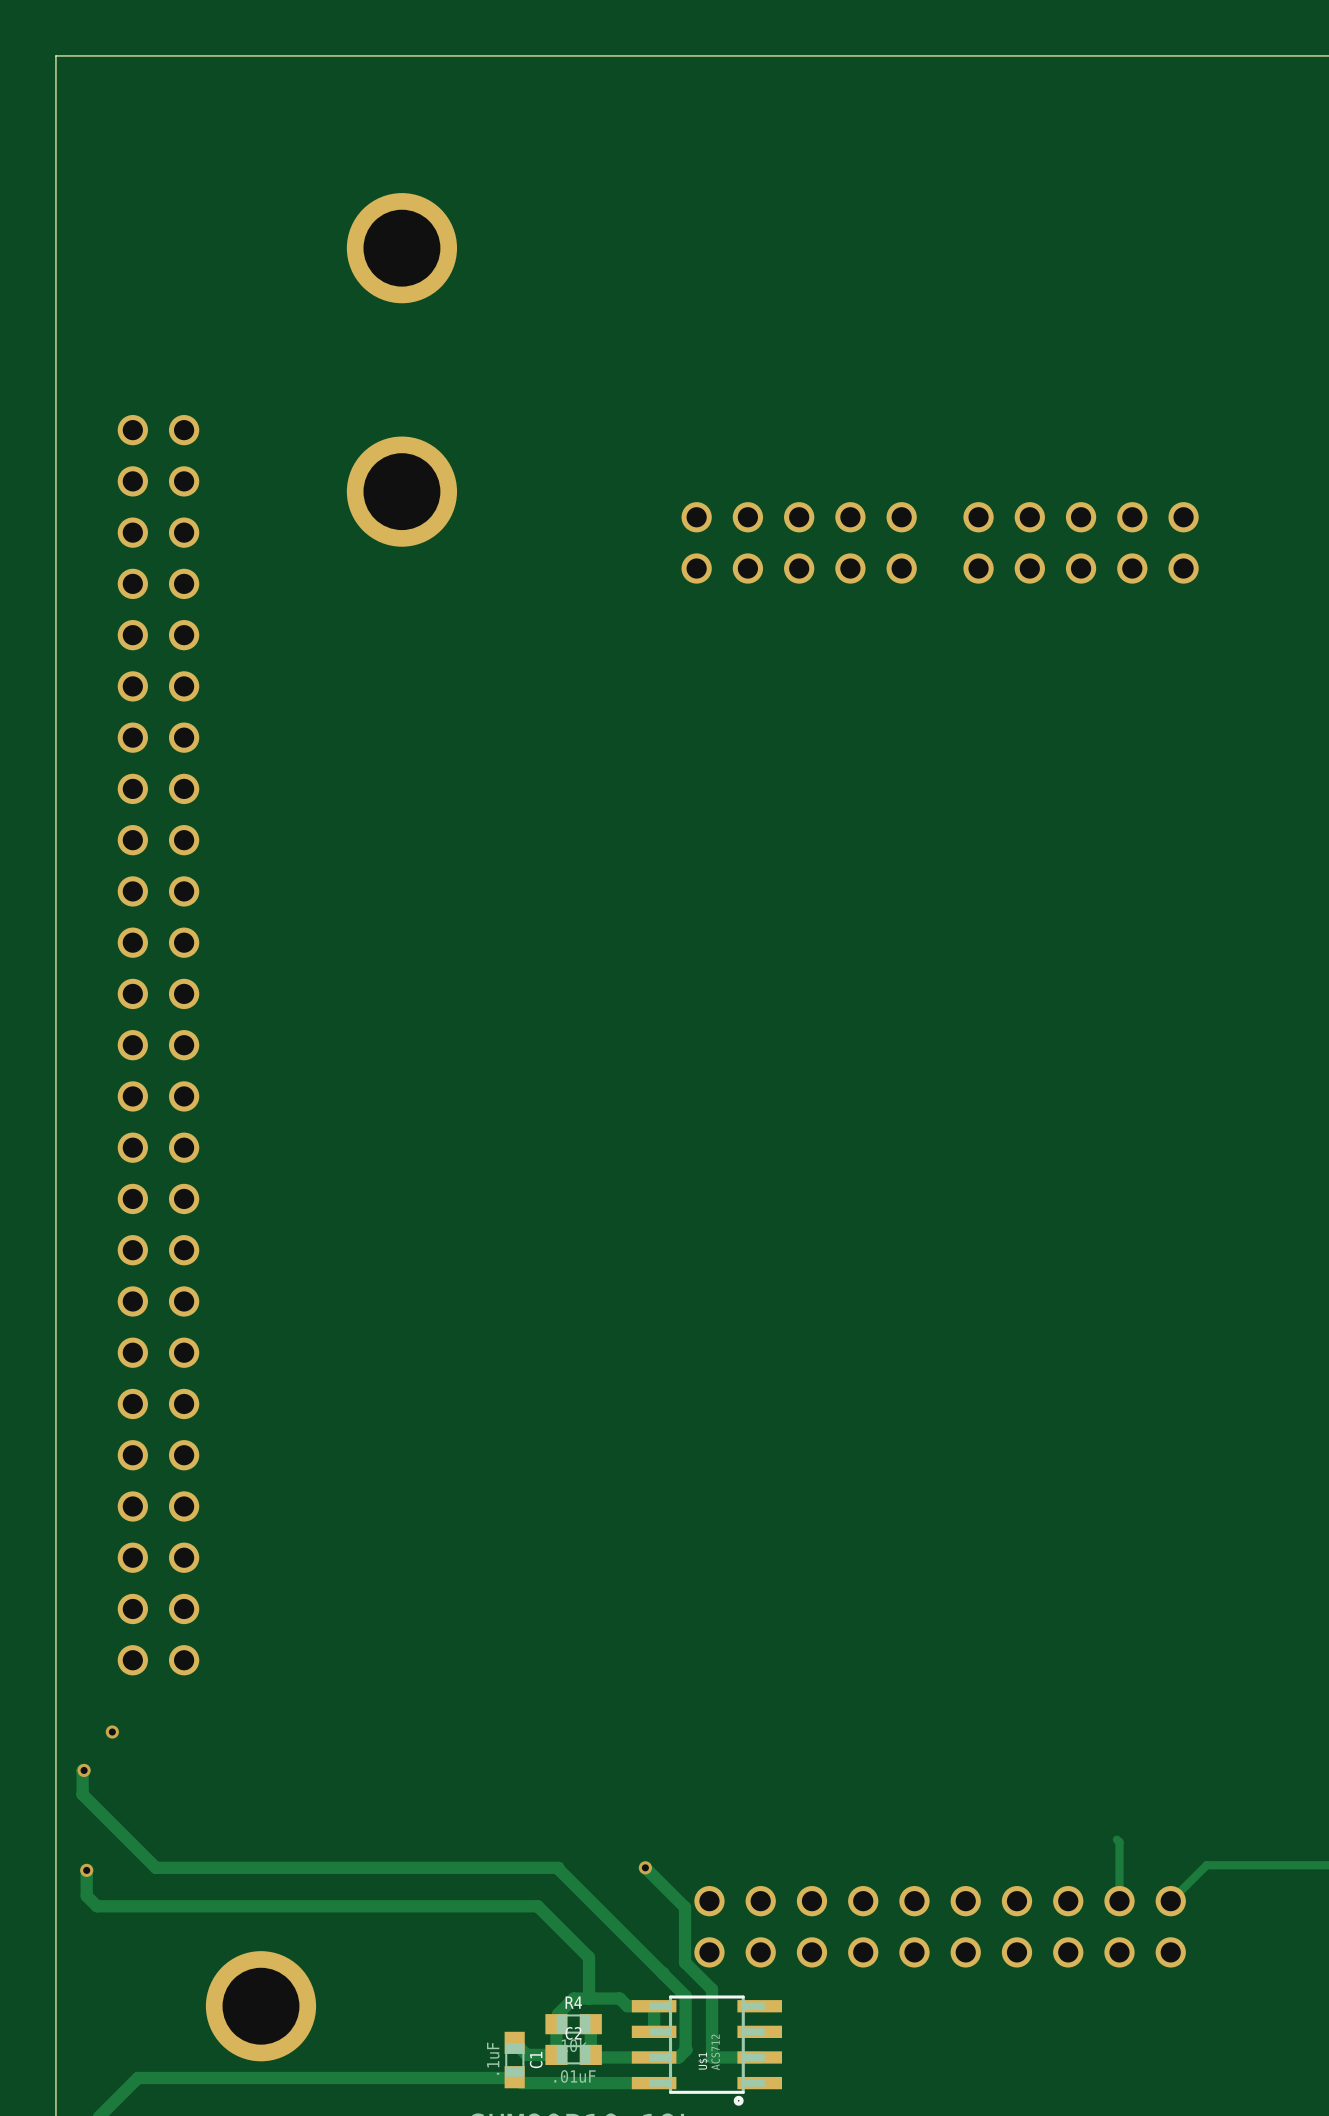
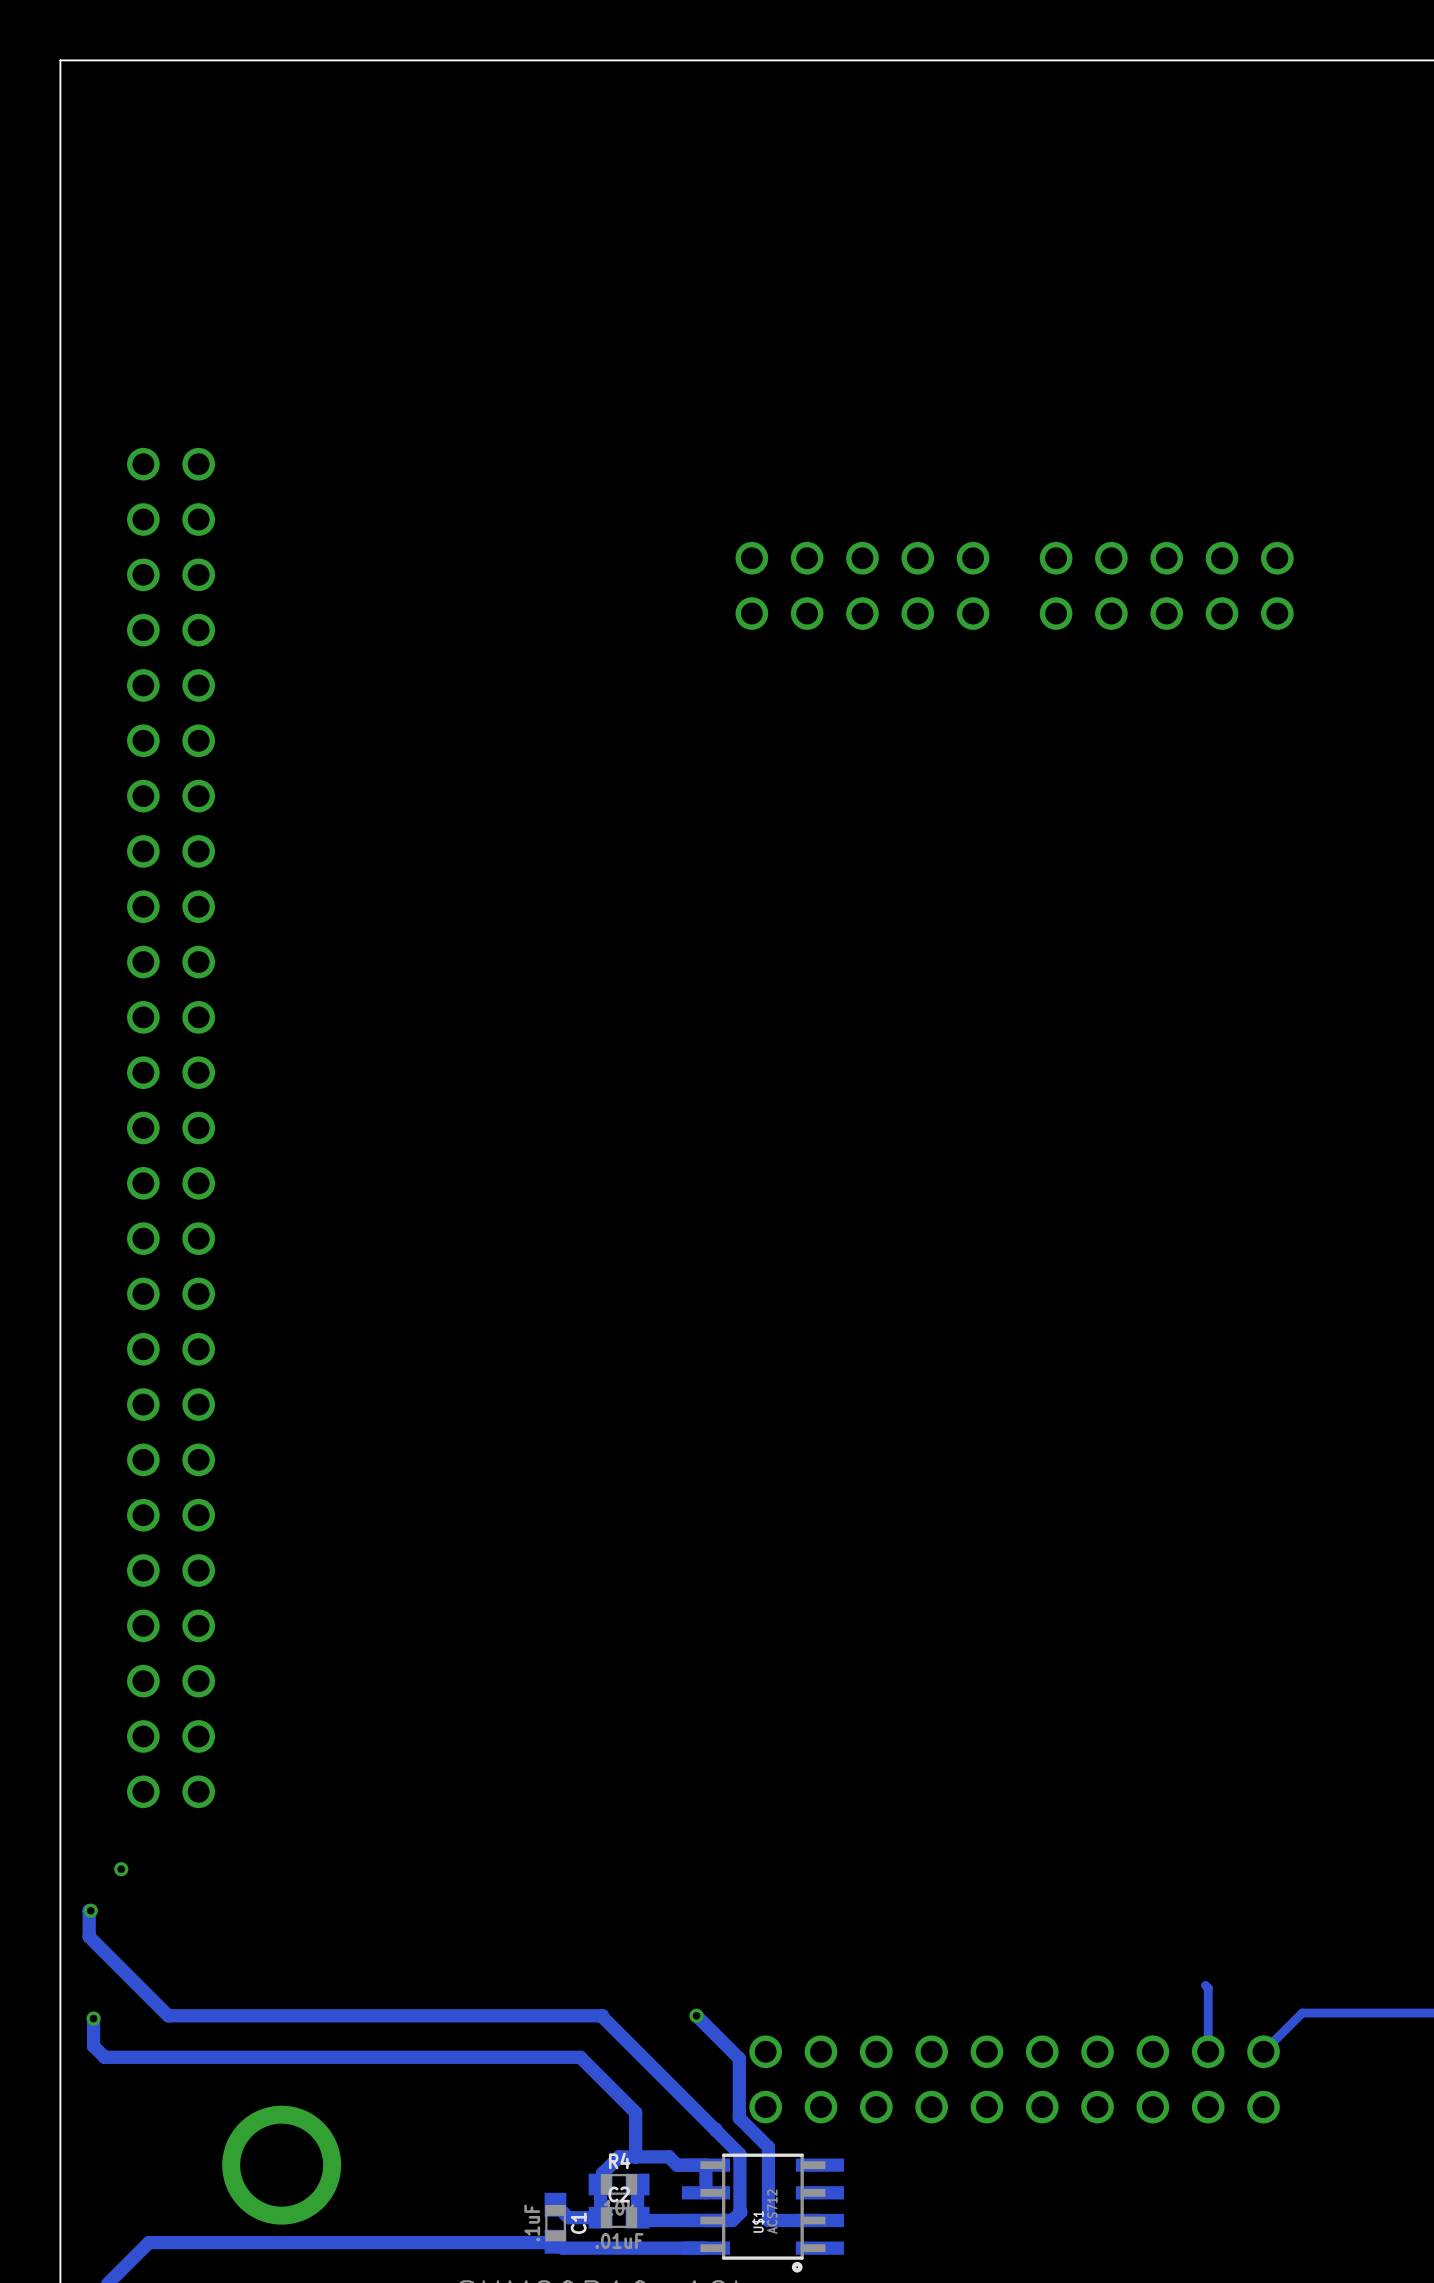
part: (401, 248) -> none
part: (401, 491) -> none

